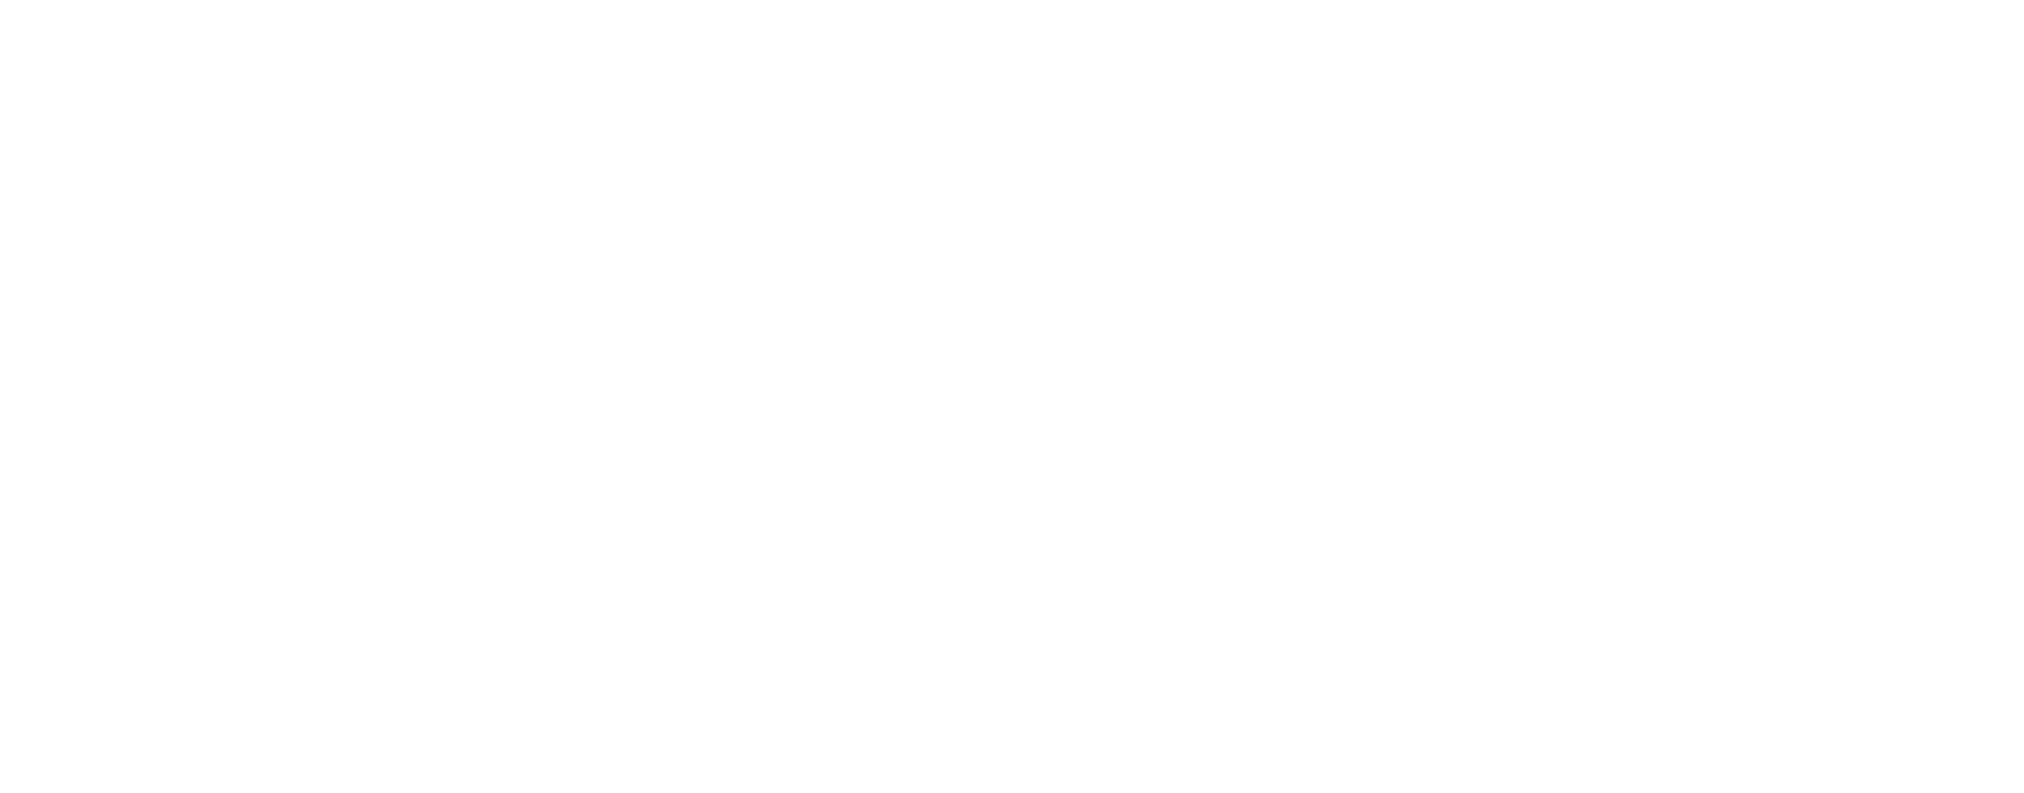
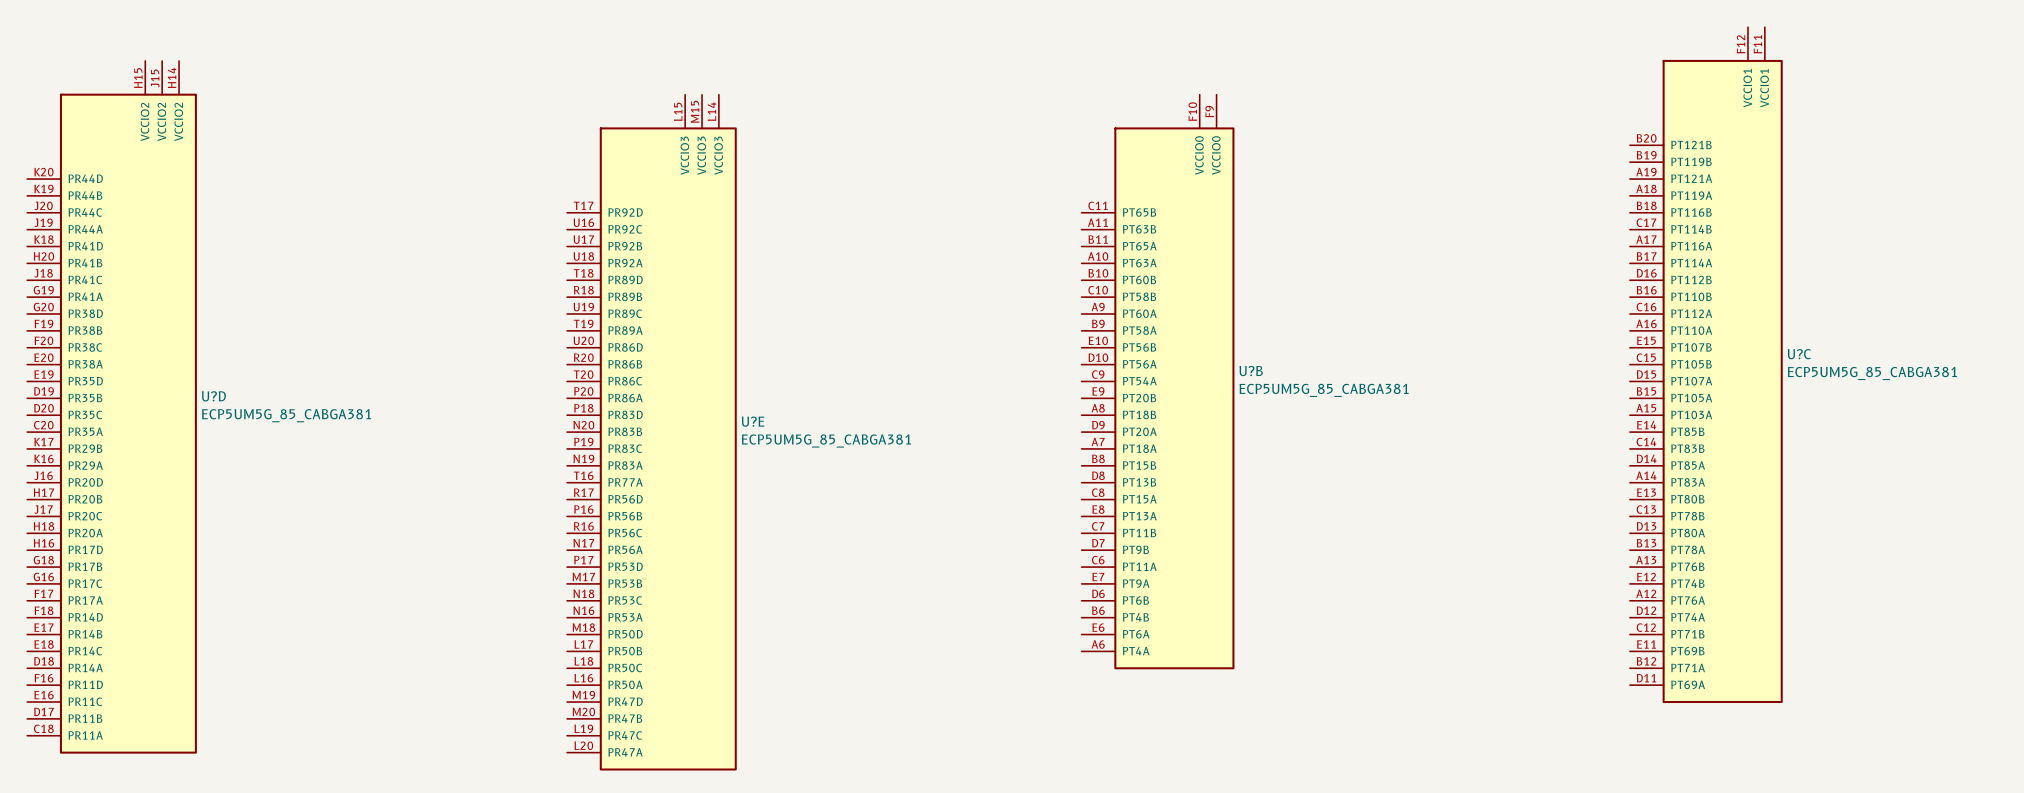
U?C: none -> ECP5UM5G_85_CABGA381 (1706, 365)
U?B: none -> ECP5UM5G_85_CABGA381 (1158, 381)
U?D: none -> ECP5UM5G_85_CABGA381 (112, 407)
U?E: none -> ECP5UM5G_85_CABGA381 (651, 432)

